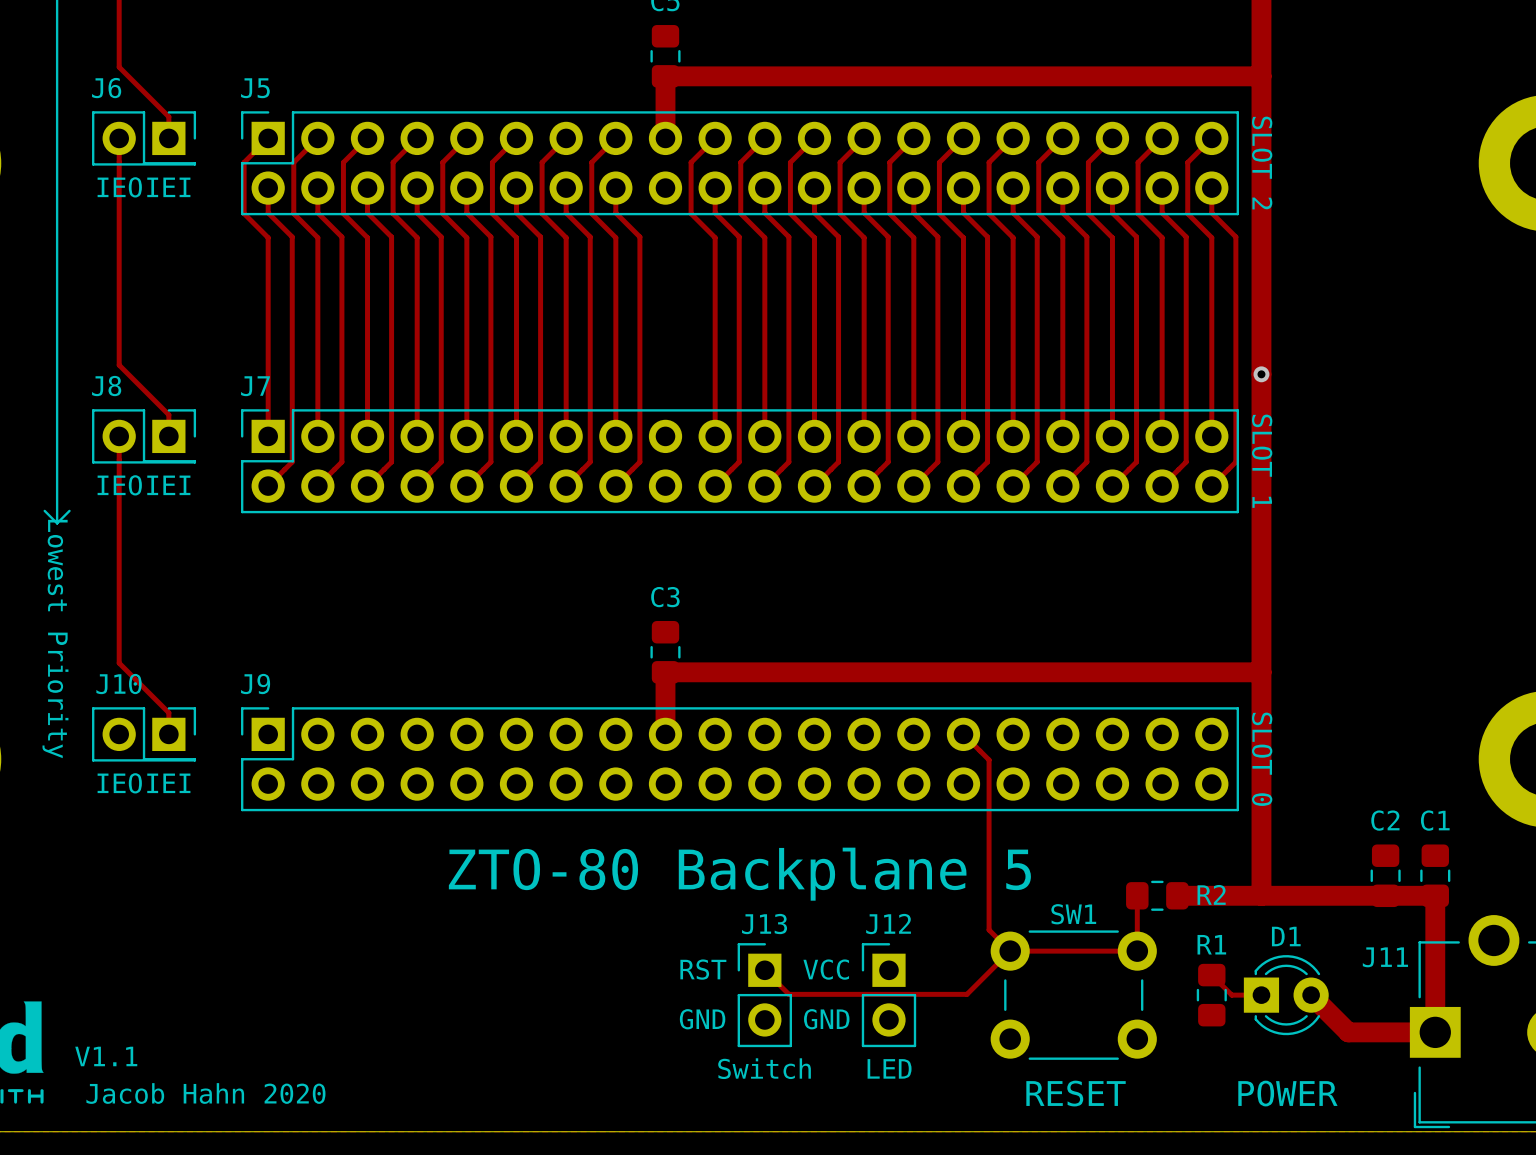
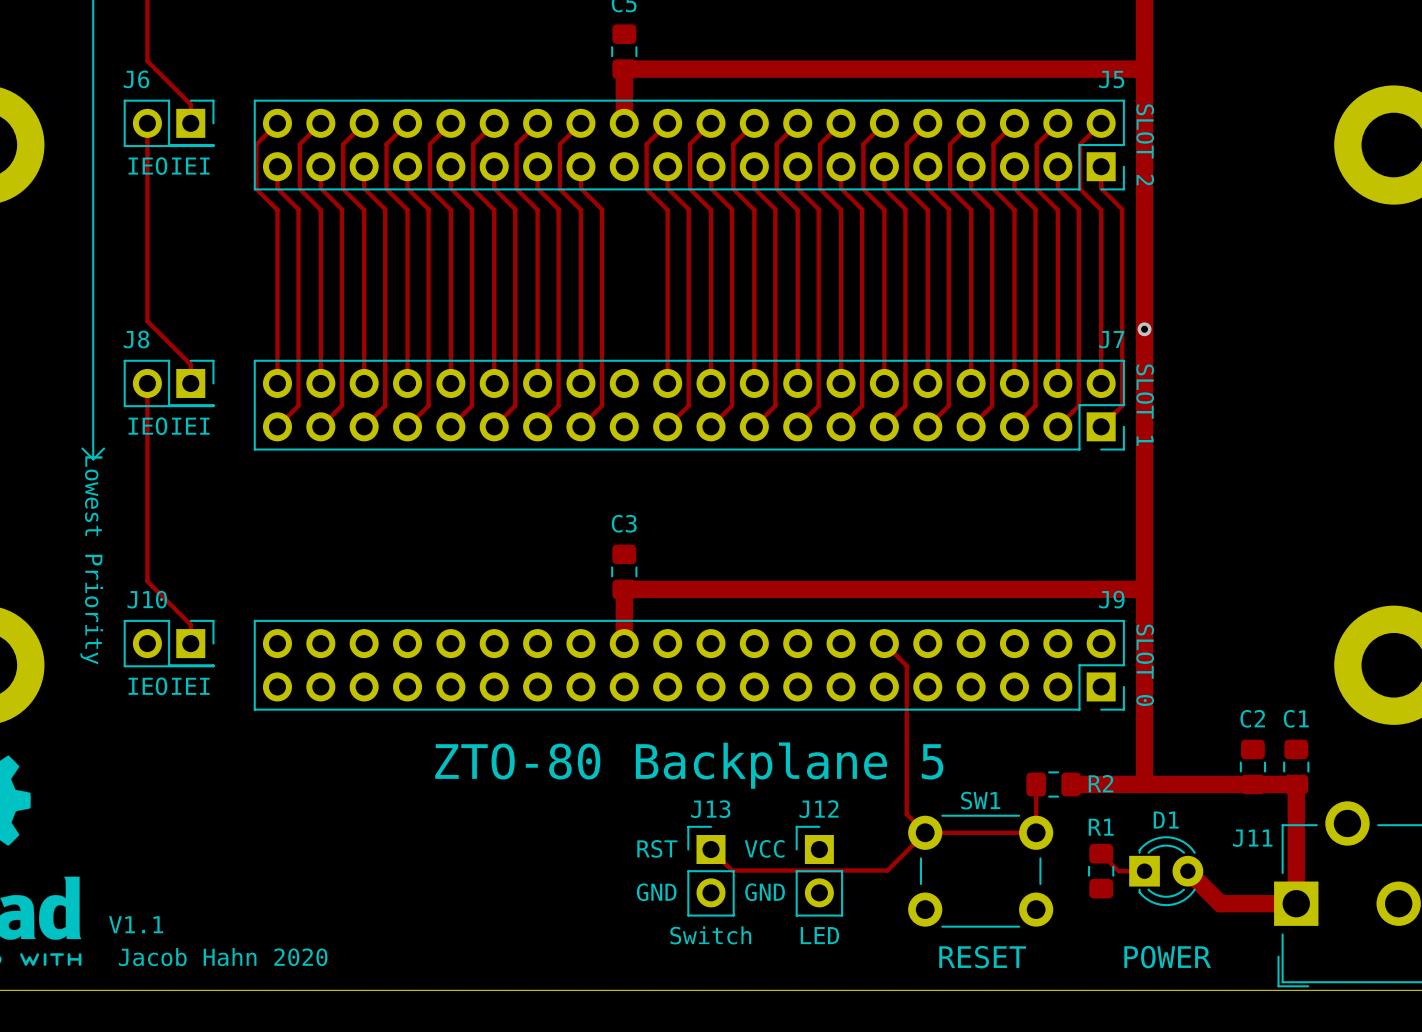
J5 name position: J5 (255, 88) -> J5 (1111, 79)
J5 rotation: 0° (739, 163) -> 180° (689, 145)
J7 name position: J7 (255, 386) -> J7 (1111, 339)
J7 rotation: 0° (739, 461) -> 180° (689, 405)
J9 name position: J9 (255, 684) -> J9 (1111, 599)
J9 rotation: 0° (739, 759) -> 180° (689, 665)

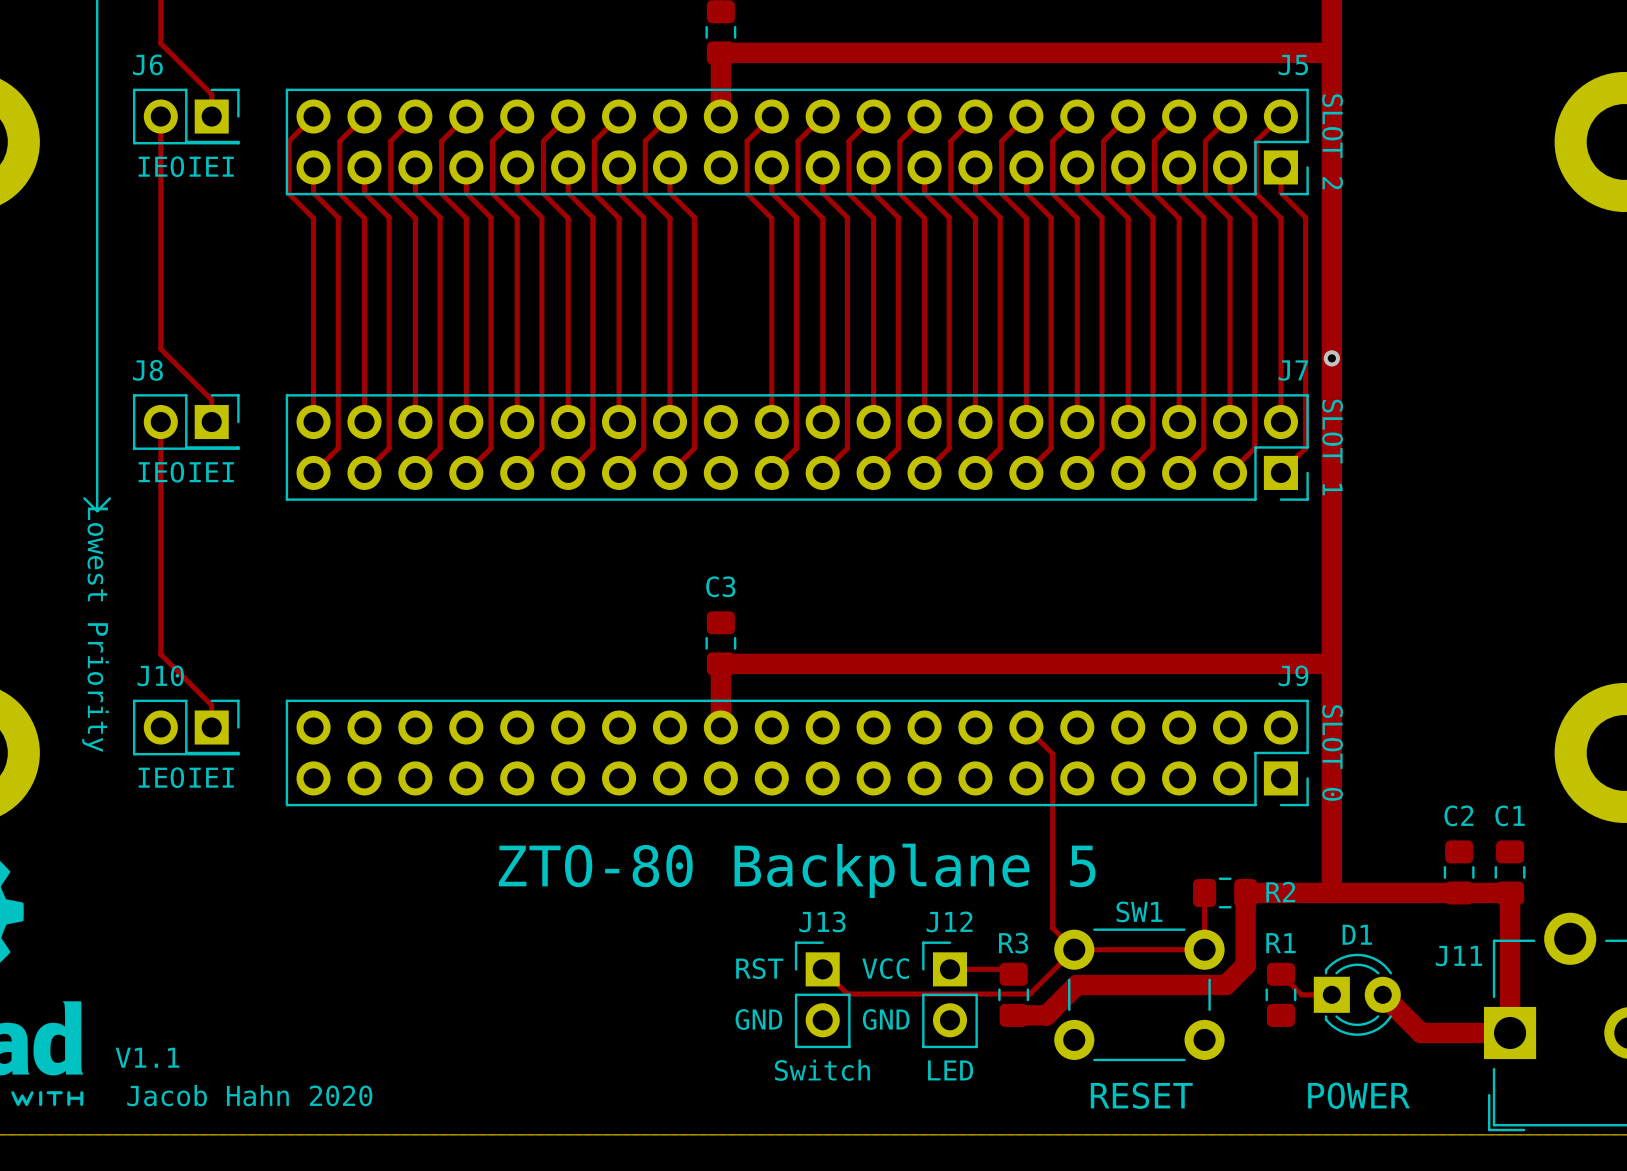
track: none -> (1245, 892) (1245, 965) (1225, 985) (1076, 985) (1046, 1015) (1013, 1015)
track: none -> (949, 969) (1008, 969) (1013, 974)
R3: none -> (1013, 994)

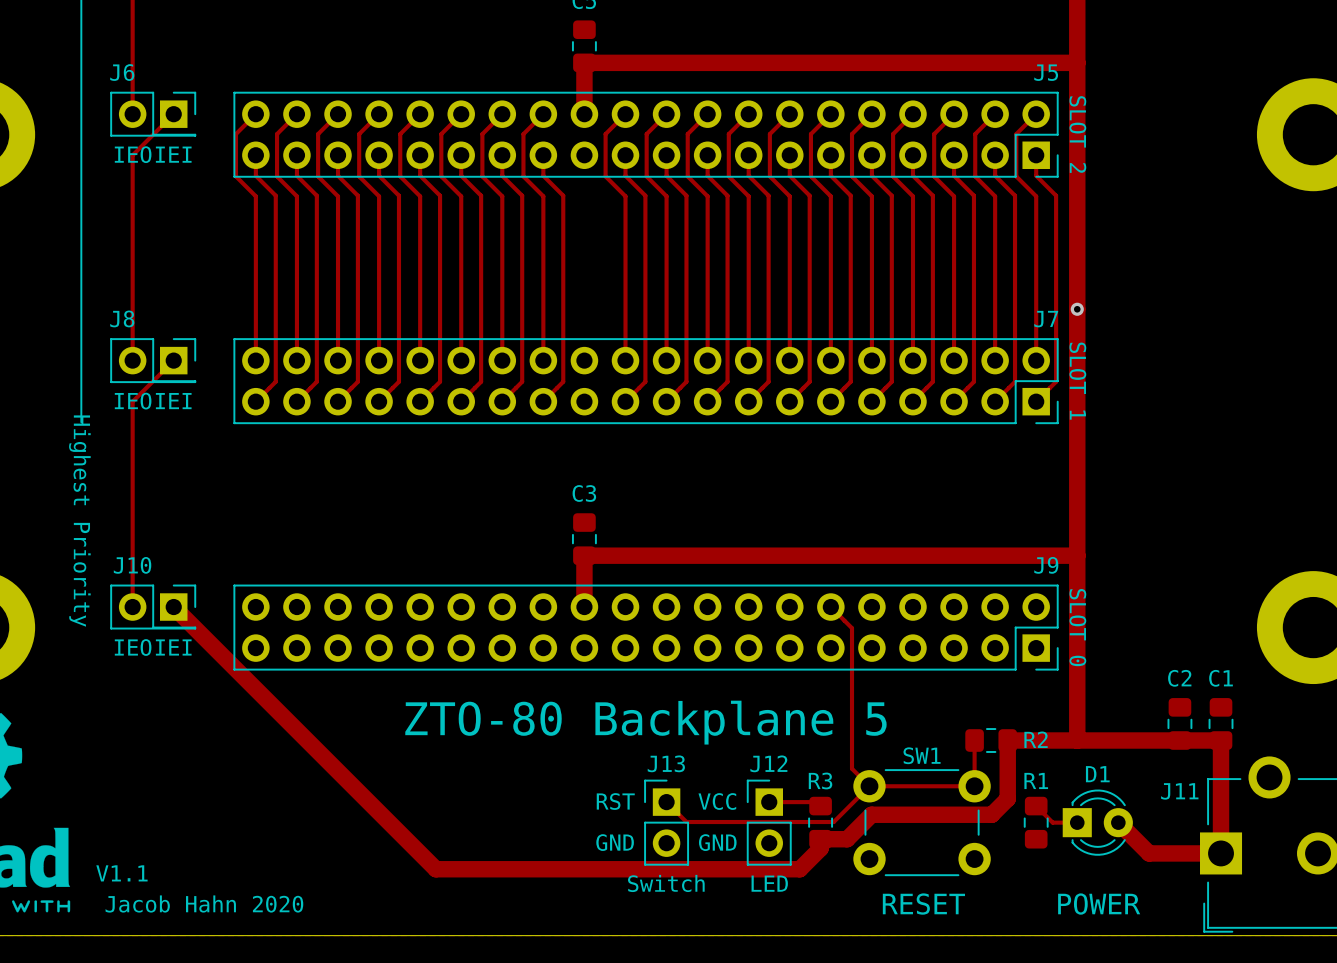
track: (160, 43) (211, 94) (211, 116) -> (132, 55) (132, 114)
track: (160, 116) (160, 167) -> (173, 114) (132, 155)
track: (160, 348) (211, 399) (211, 422) -> (132, 301) (132, 360)
track: (160, 422) (160, 472) -> (173, 360) (132, 401)
line: (84, 498) (97, 511) -> none
line: (97, 498) (97, 511) -> none
line: (109, 498) (97, 511) -> none
text: Lowest Priority (95, 629) -> Highest Priority (79, 521)
track: (160, 654) (211, 705) (211, 727) -> (132, 548) (132, 607)
track: none -> (173, 607) (435, 869) (799, 869) (820, 848) (820, 839)

